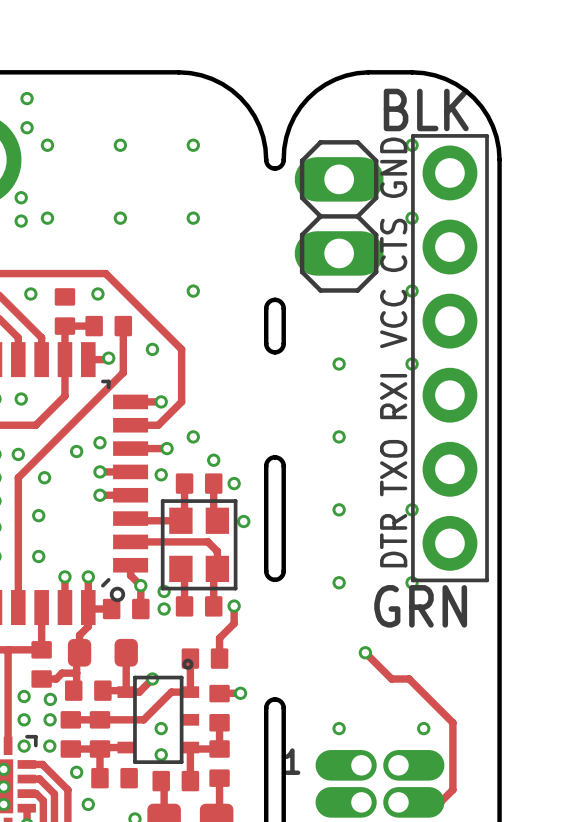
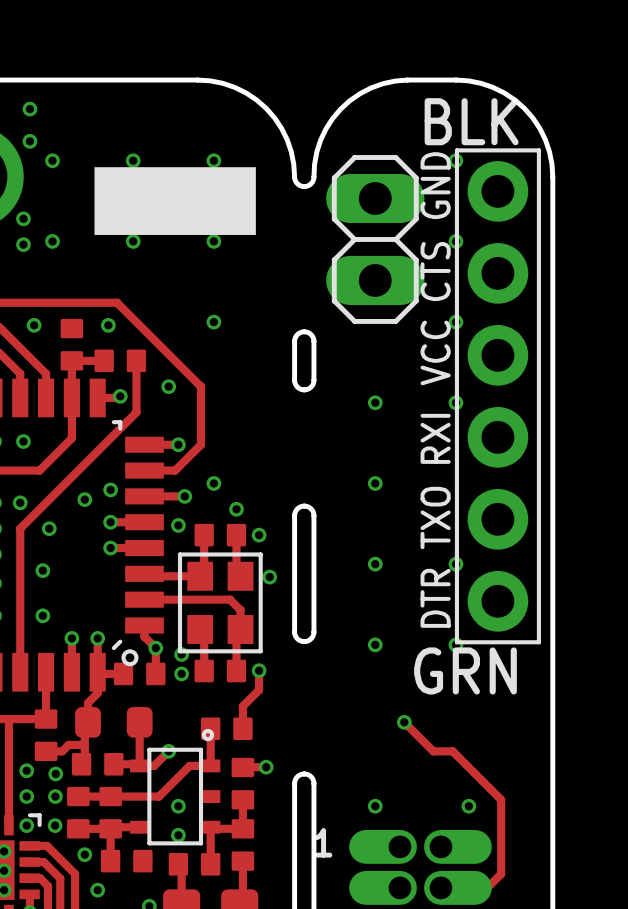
drawing: none -> [94, 167, 256, 235]

